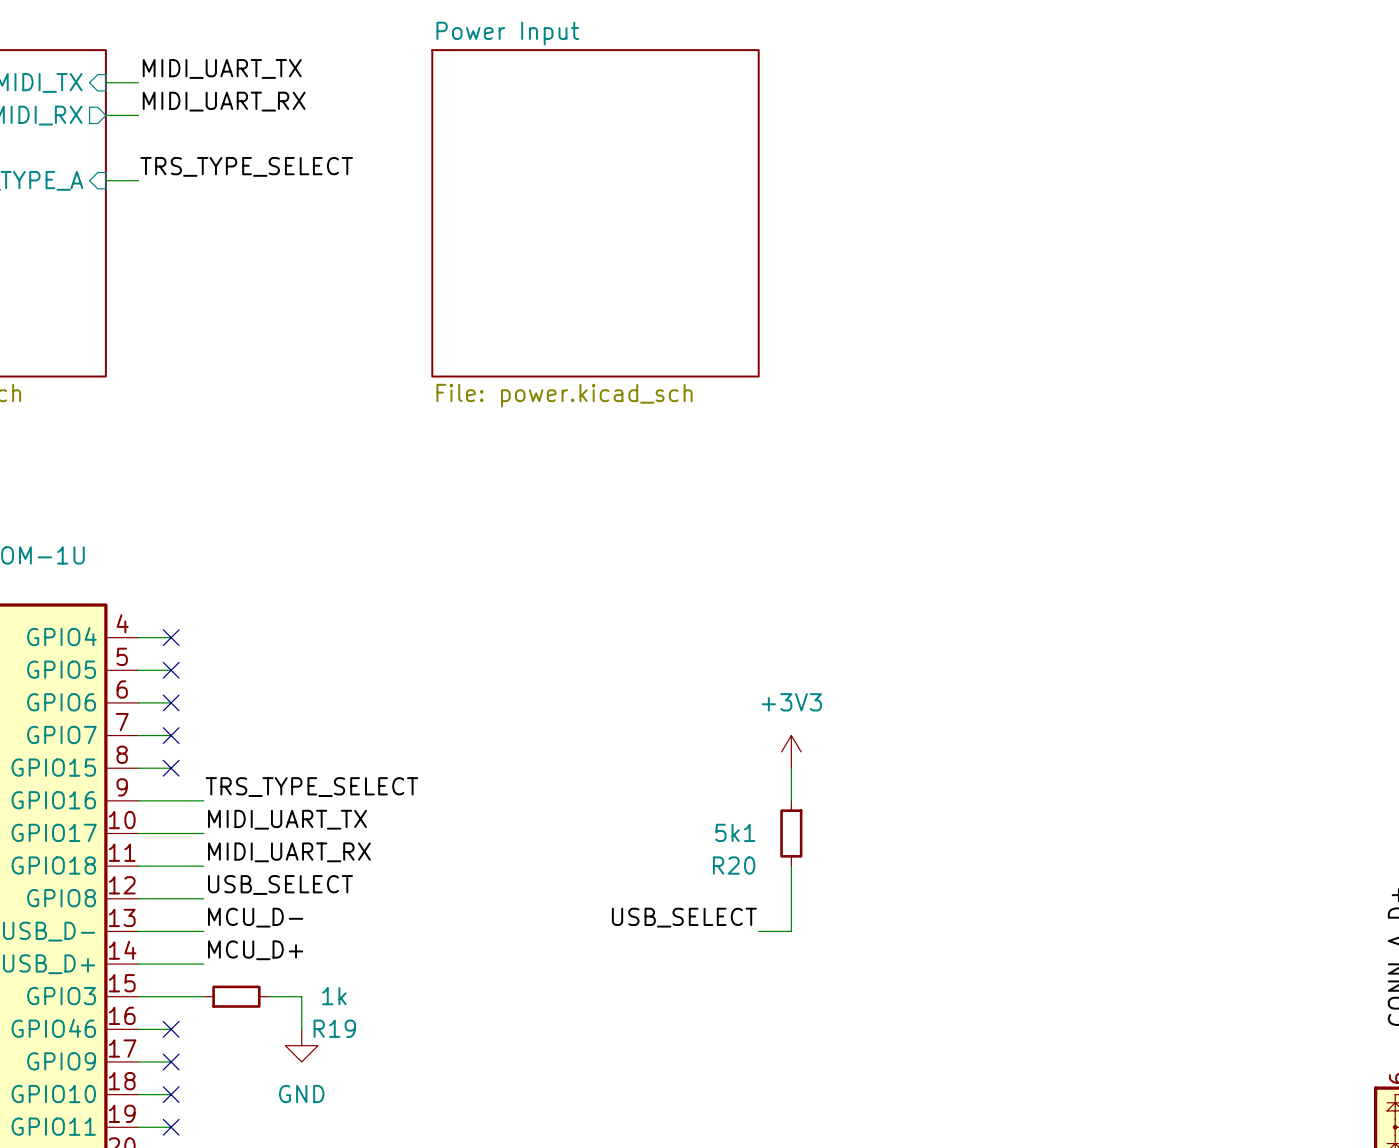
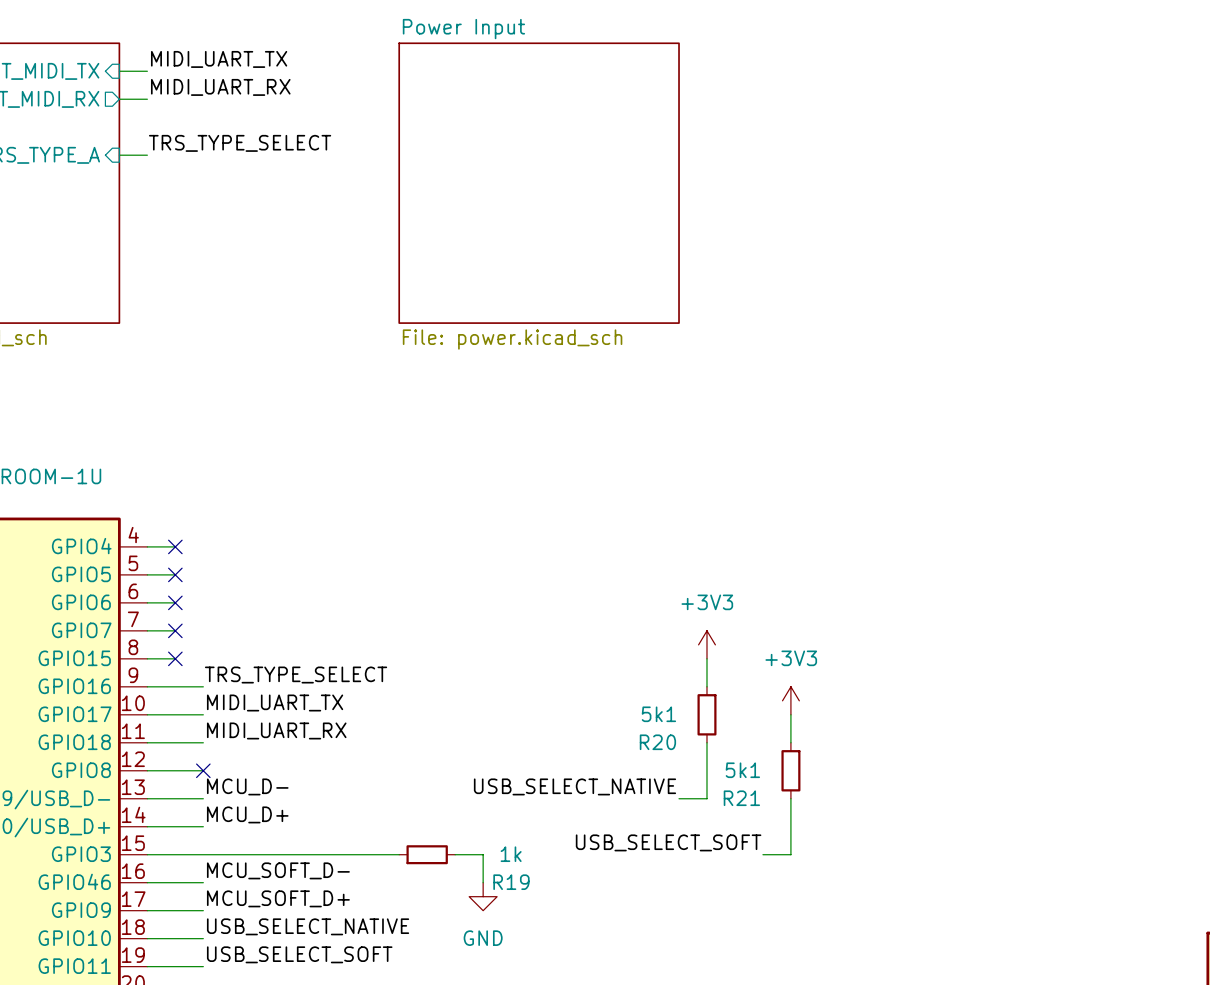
power symbol: none -> +3V3 (790, 700)
wire: none -> (790, 714) (790, 742)
label: USB_SELECT (280, 884) -> none
no-connect mark: none -> (203, 770)
R21: none -> 5k1 (790, 770)
label: USB_SELECT (684, 917) -> USB_SELECT_NATIVE (574, 786)
wire: none -> (790, 798) (790, 854) (762, 854)
label: none -> USB_SELECT_SOFT (668, 842)
wire: none -> (203, 854) (259, 854)
R19 position: (236, 996) -> (427, 854)
wire: (301, 996) (301, 1029) -> (287, 854) (399, 854)
wire: none -> (455, 854) (483, 854) (483, 882)
label: none -> MCU_SOFT_D- (278, 870)
wire: none -> (175, 882) (203, 882)
no-connect mark: (171, 1029) -> none
power symbol position: GND (301, 1045) -> GND (483, 896)
label: none -> MCU_SOFT_D+ (278, 898)
wire: none -> (175, 910) (203, 910)
no-connect mark: (171, 1061) -> none
label: none -> USB_SELECT_NATIVE (308, 926)
wire: none -> (175, 938) (203, 938)
no-connect mark: (171, 1094) -> none
label: none -> USB_SELECT_SOFT (299, 954)
wire: none -> (175, 966) (203, 966)
no-connect mark: (171, 1127) -> none

